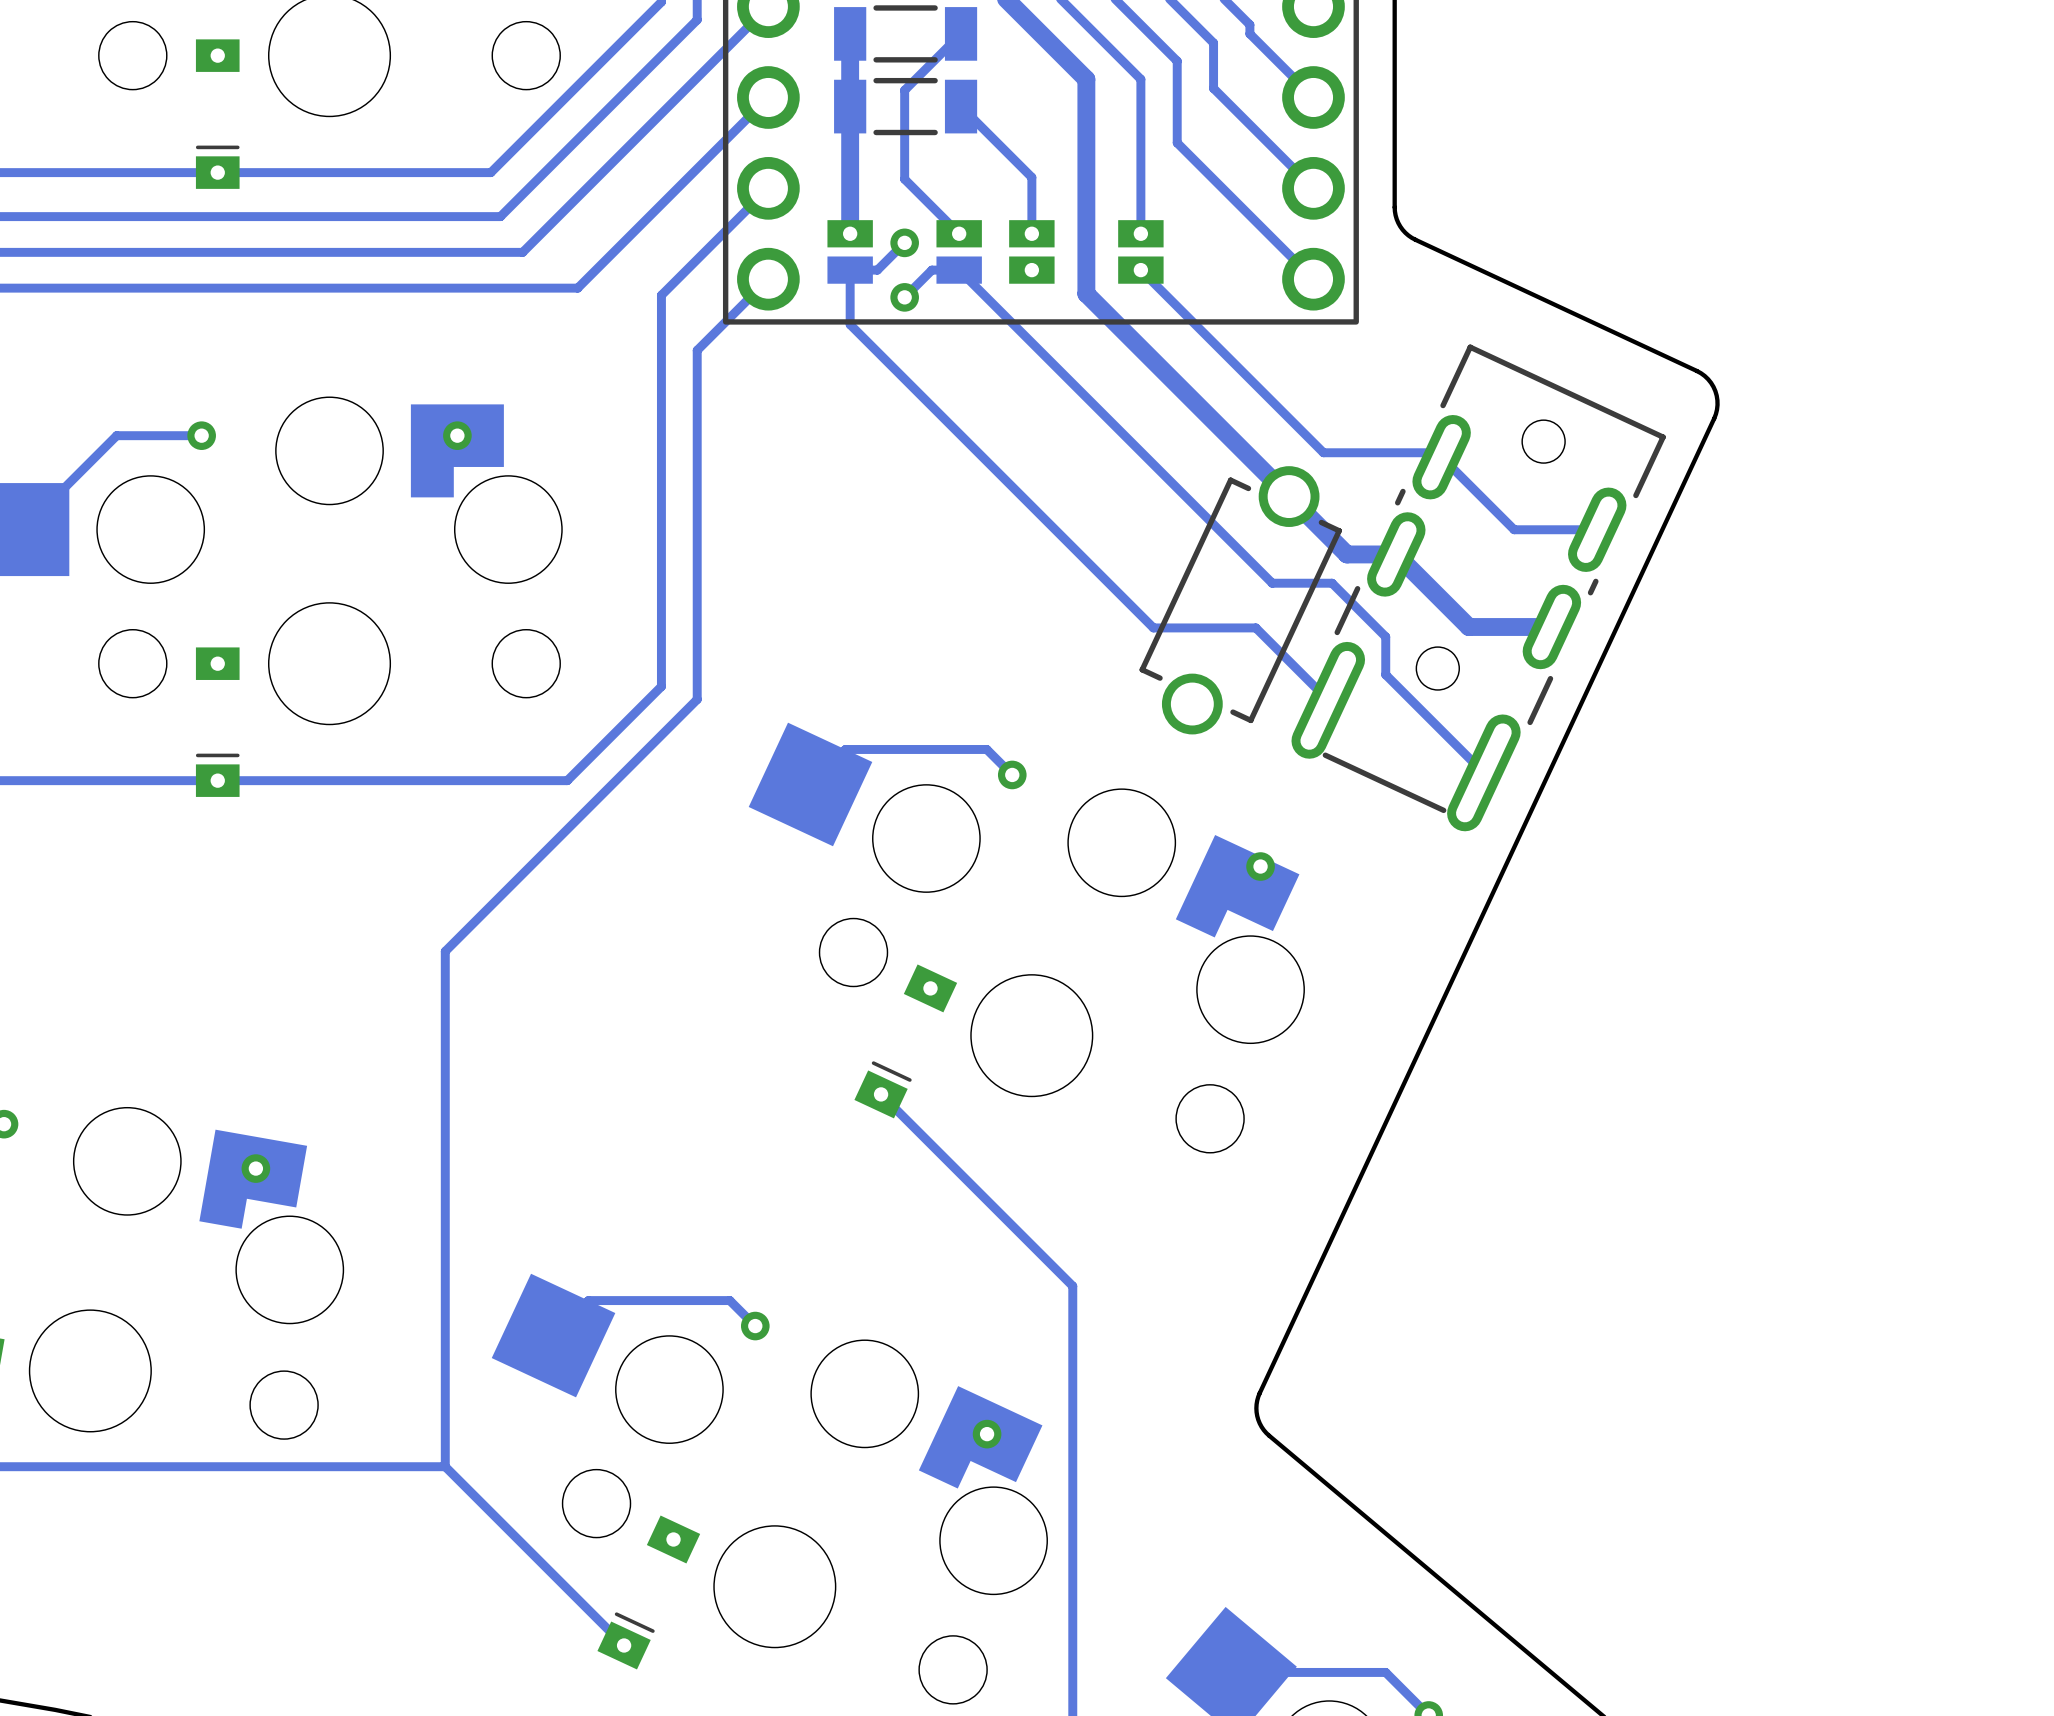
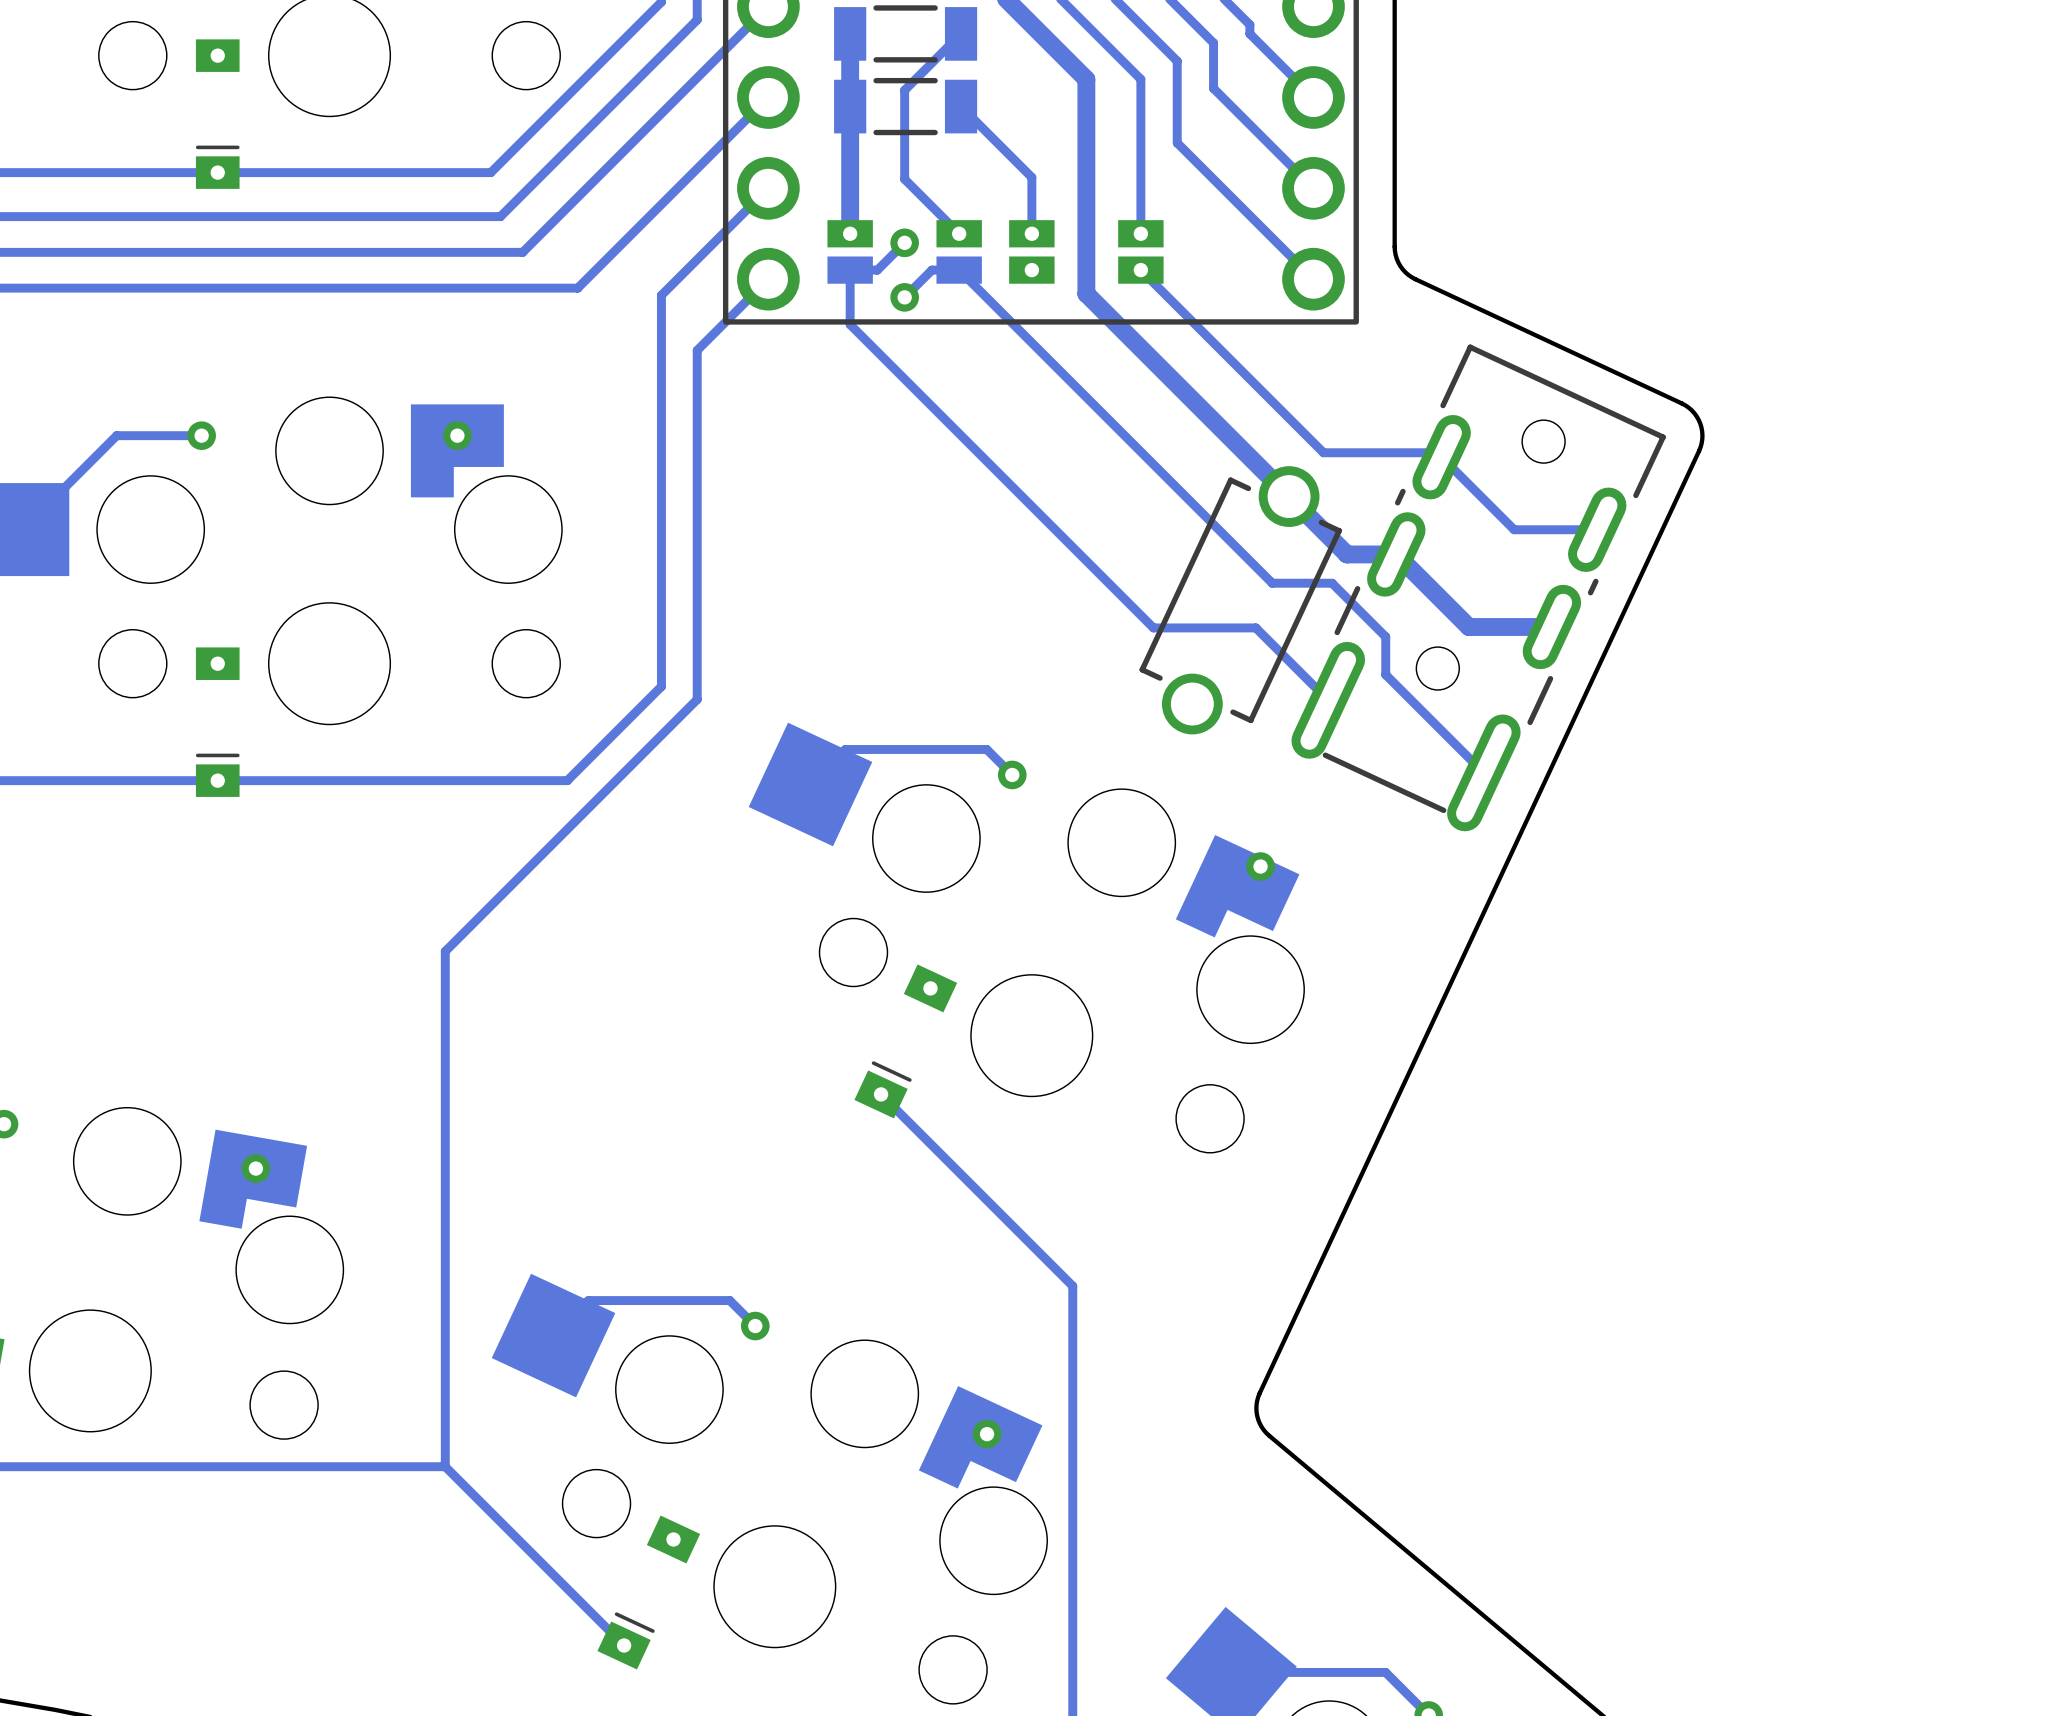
board edge: (1394, 207) (1400, 226) (1411, 237) (1704, 376) (1715, 391) (1717, 404) (1714, 418) (1699, 450) -> (1394, 207) (1395, 254) (1400, 265) (1408, 274) (1685, 405) (1694, 413) (1700, 423) (1702, 439) (1699, 450)

